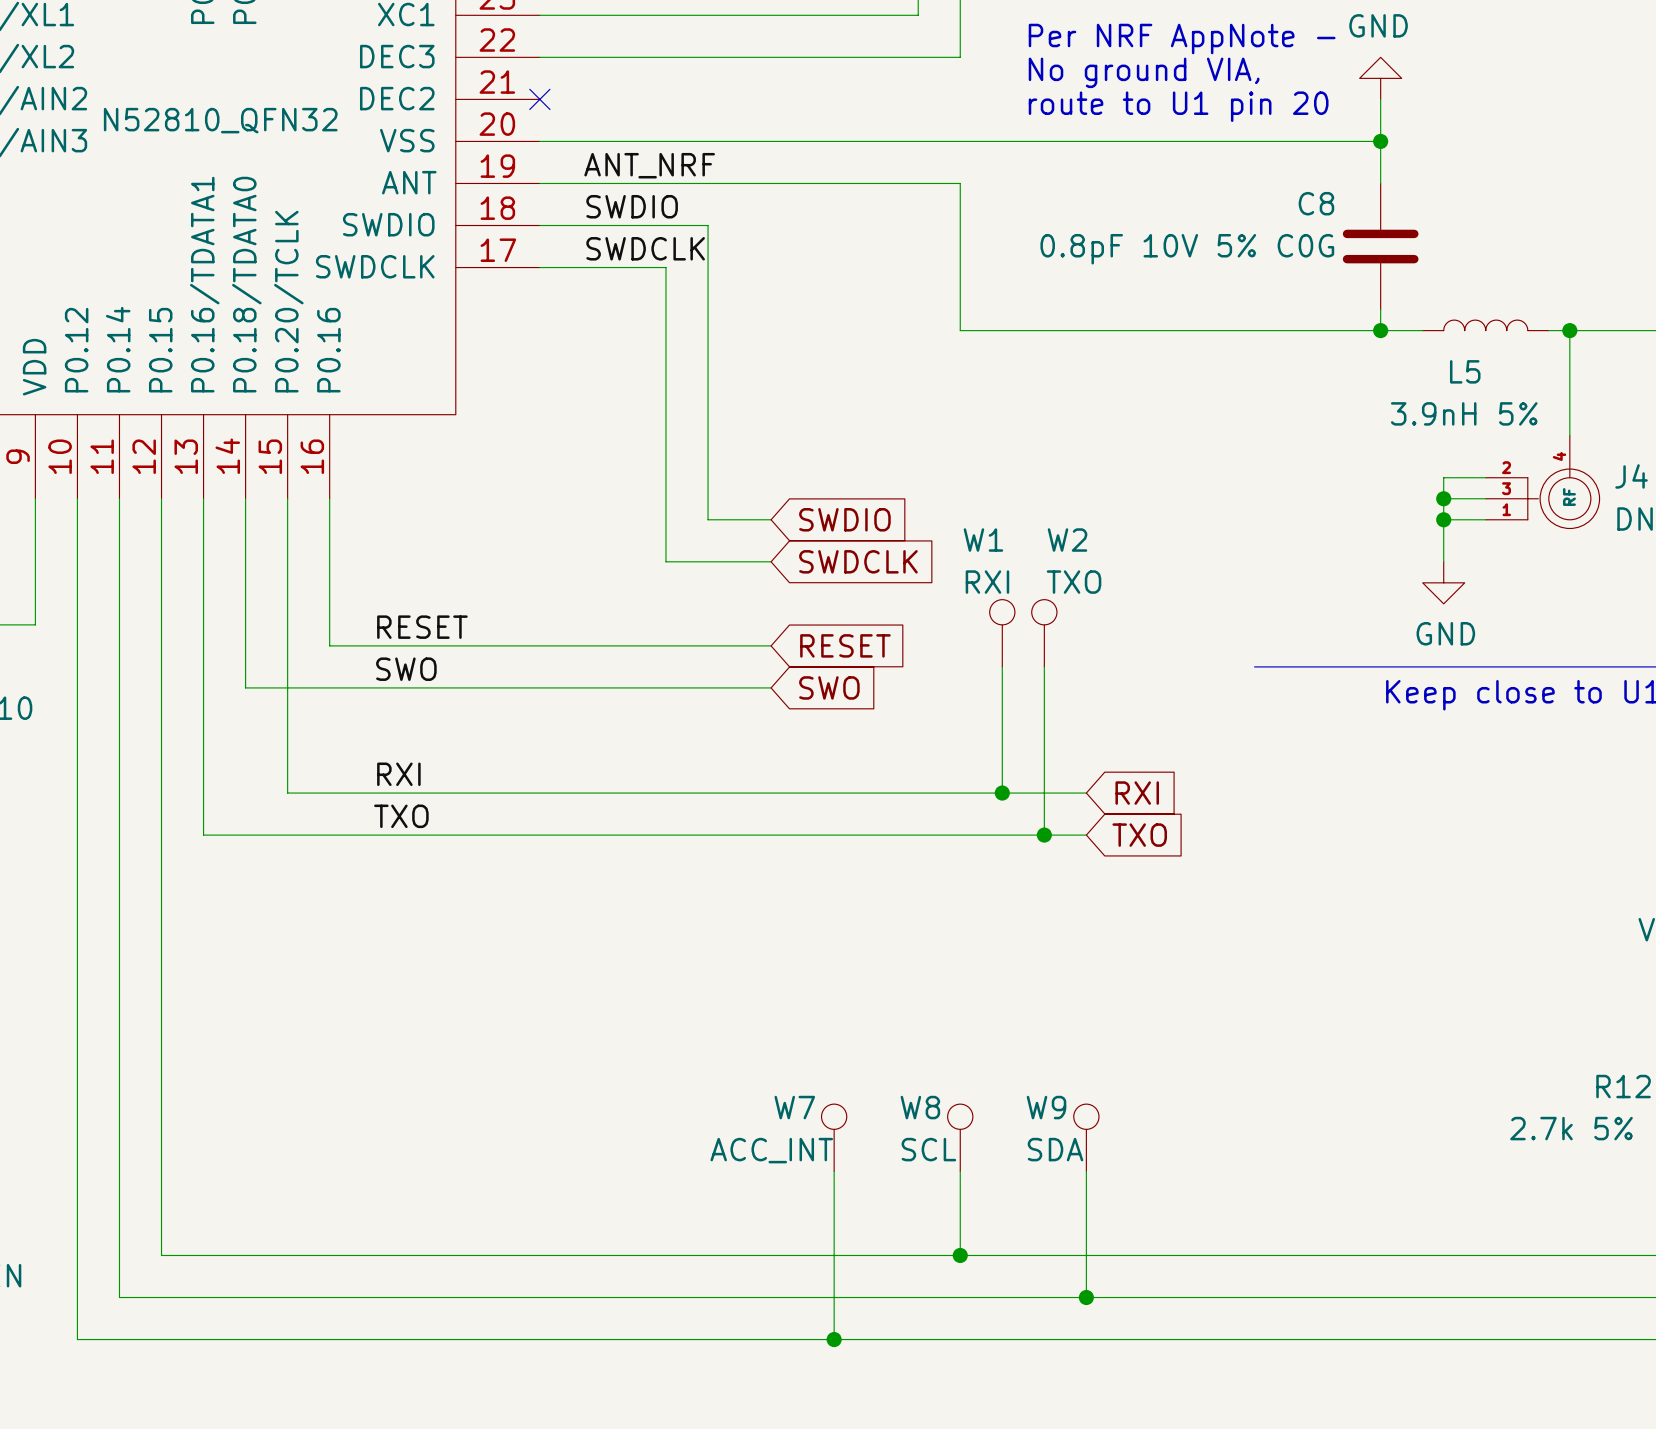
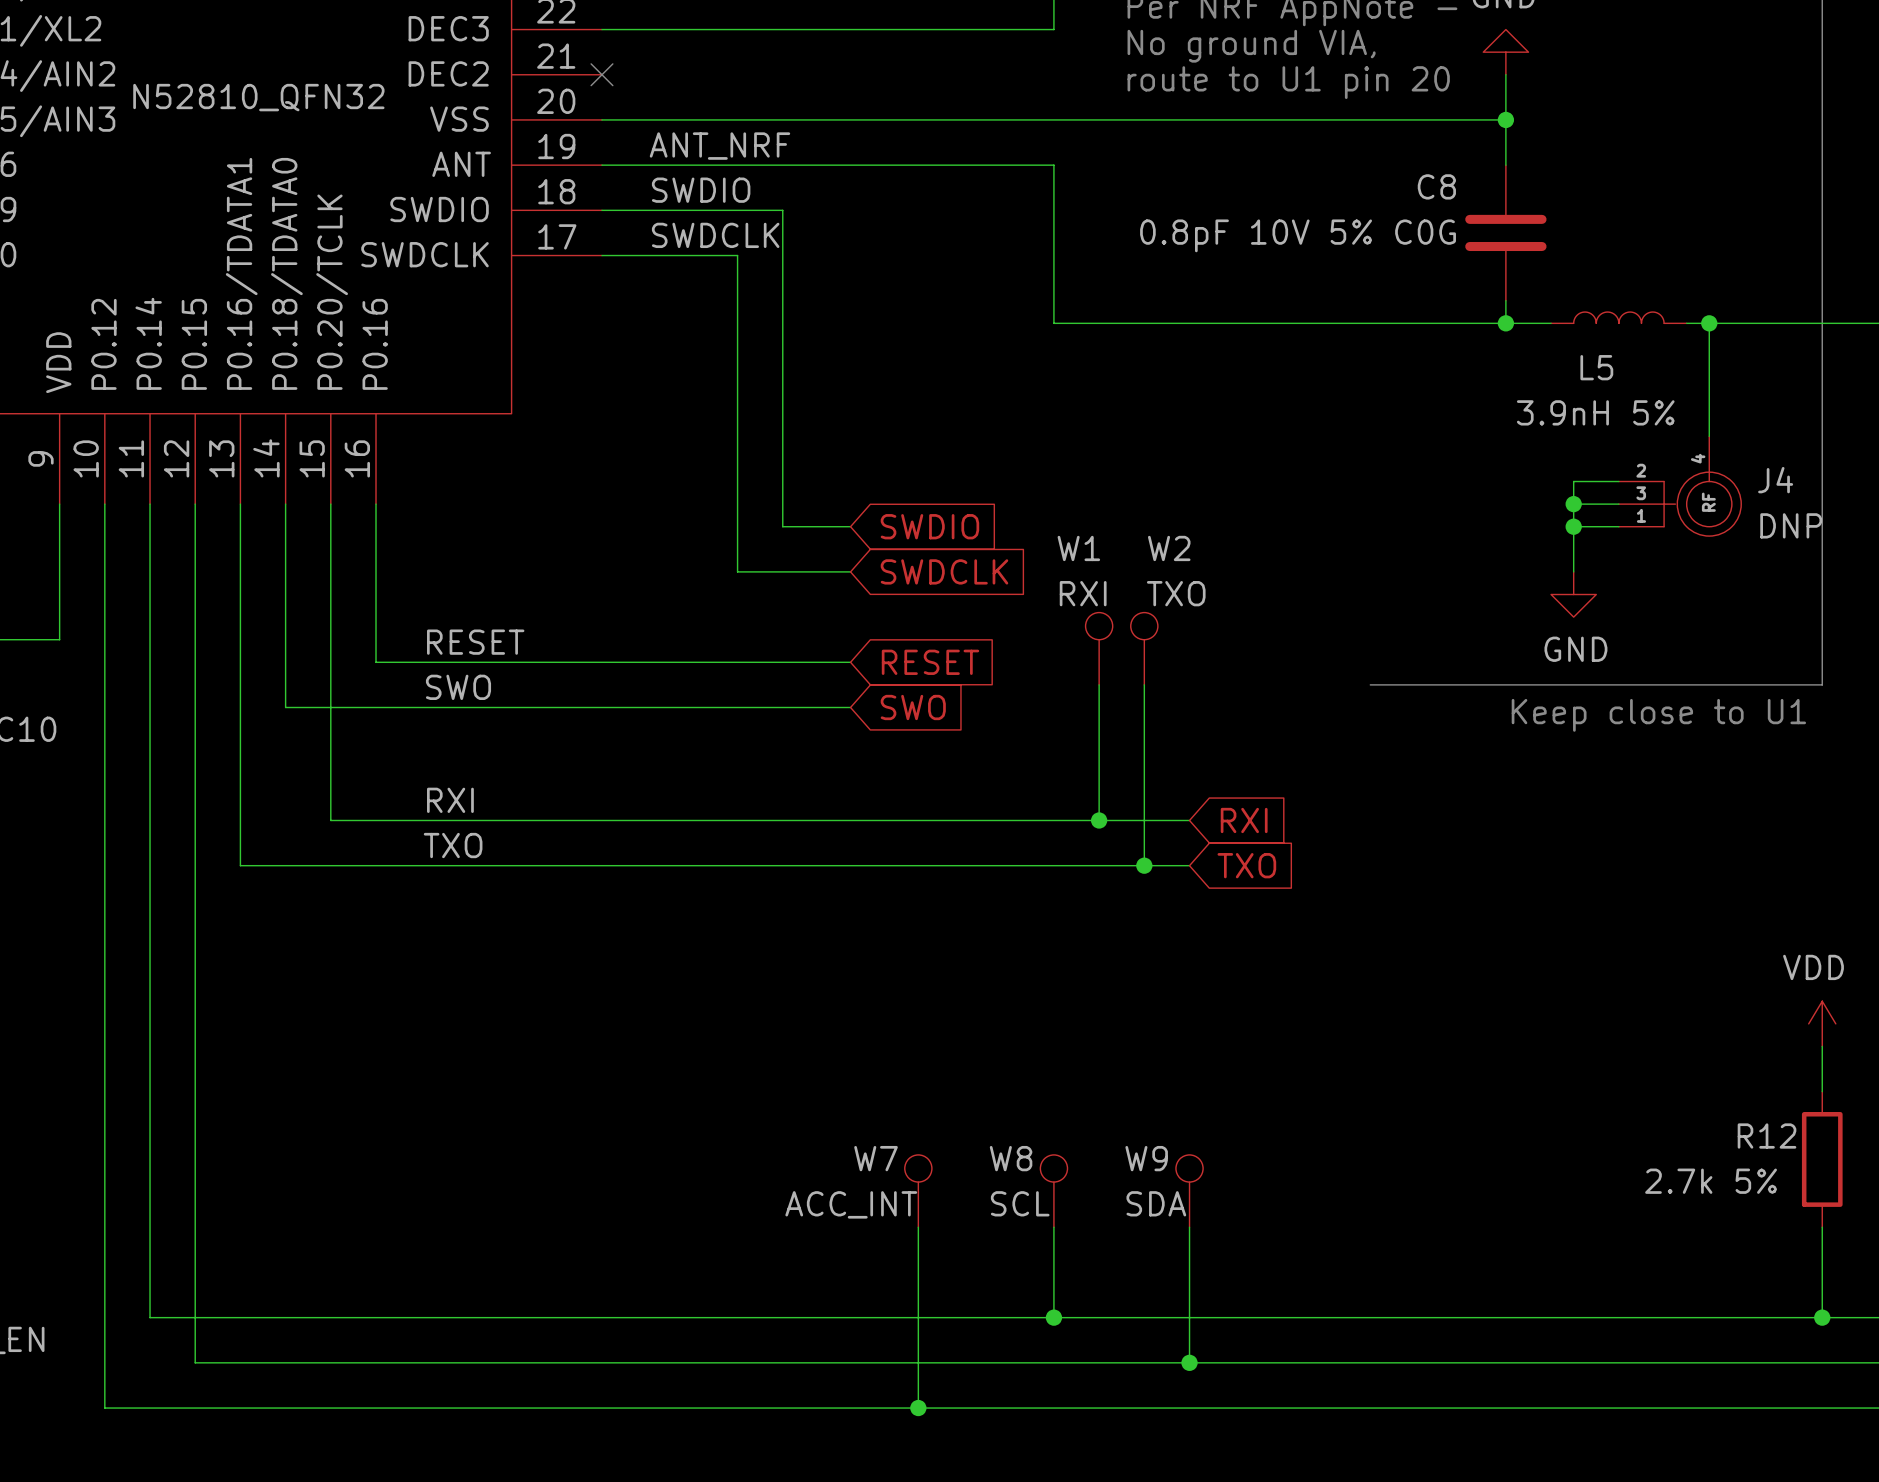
wire: (119, 1255) (119, 1297) (161, 1297) -> (150, 1317) (195, 1317) (195, 1362)

